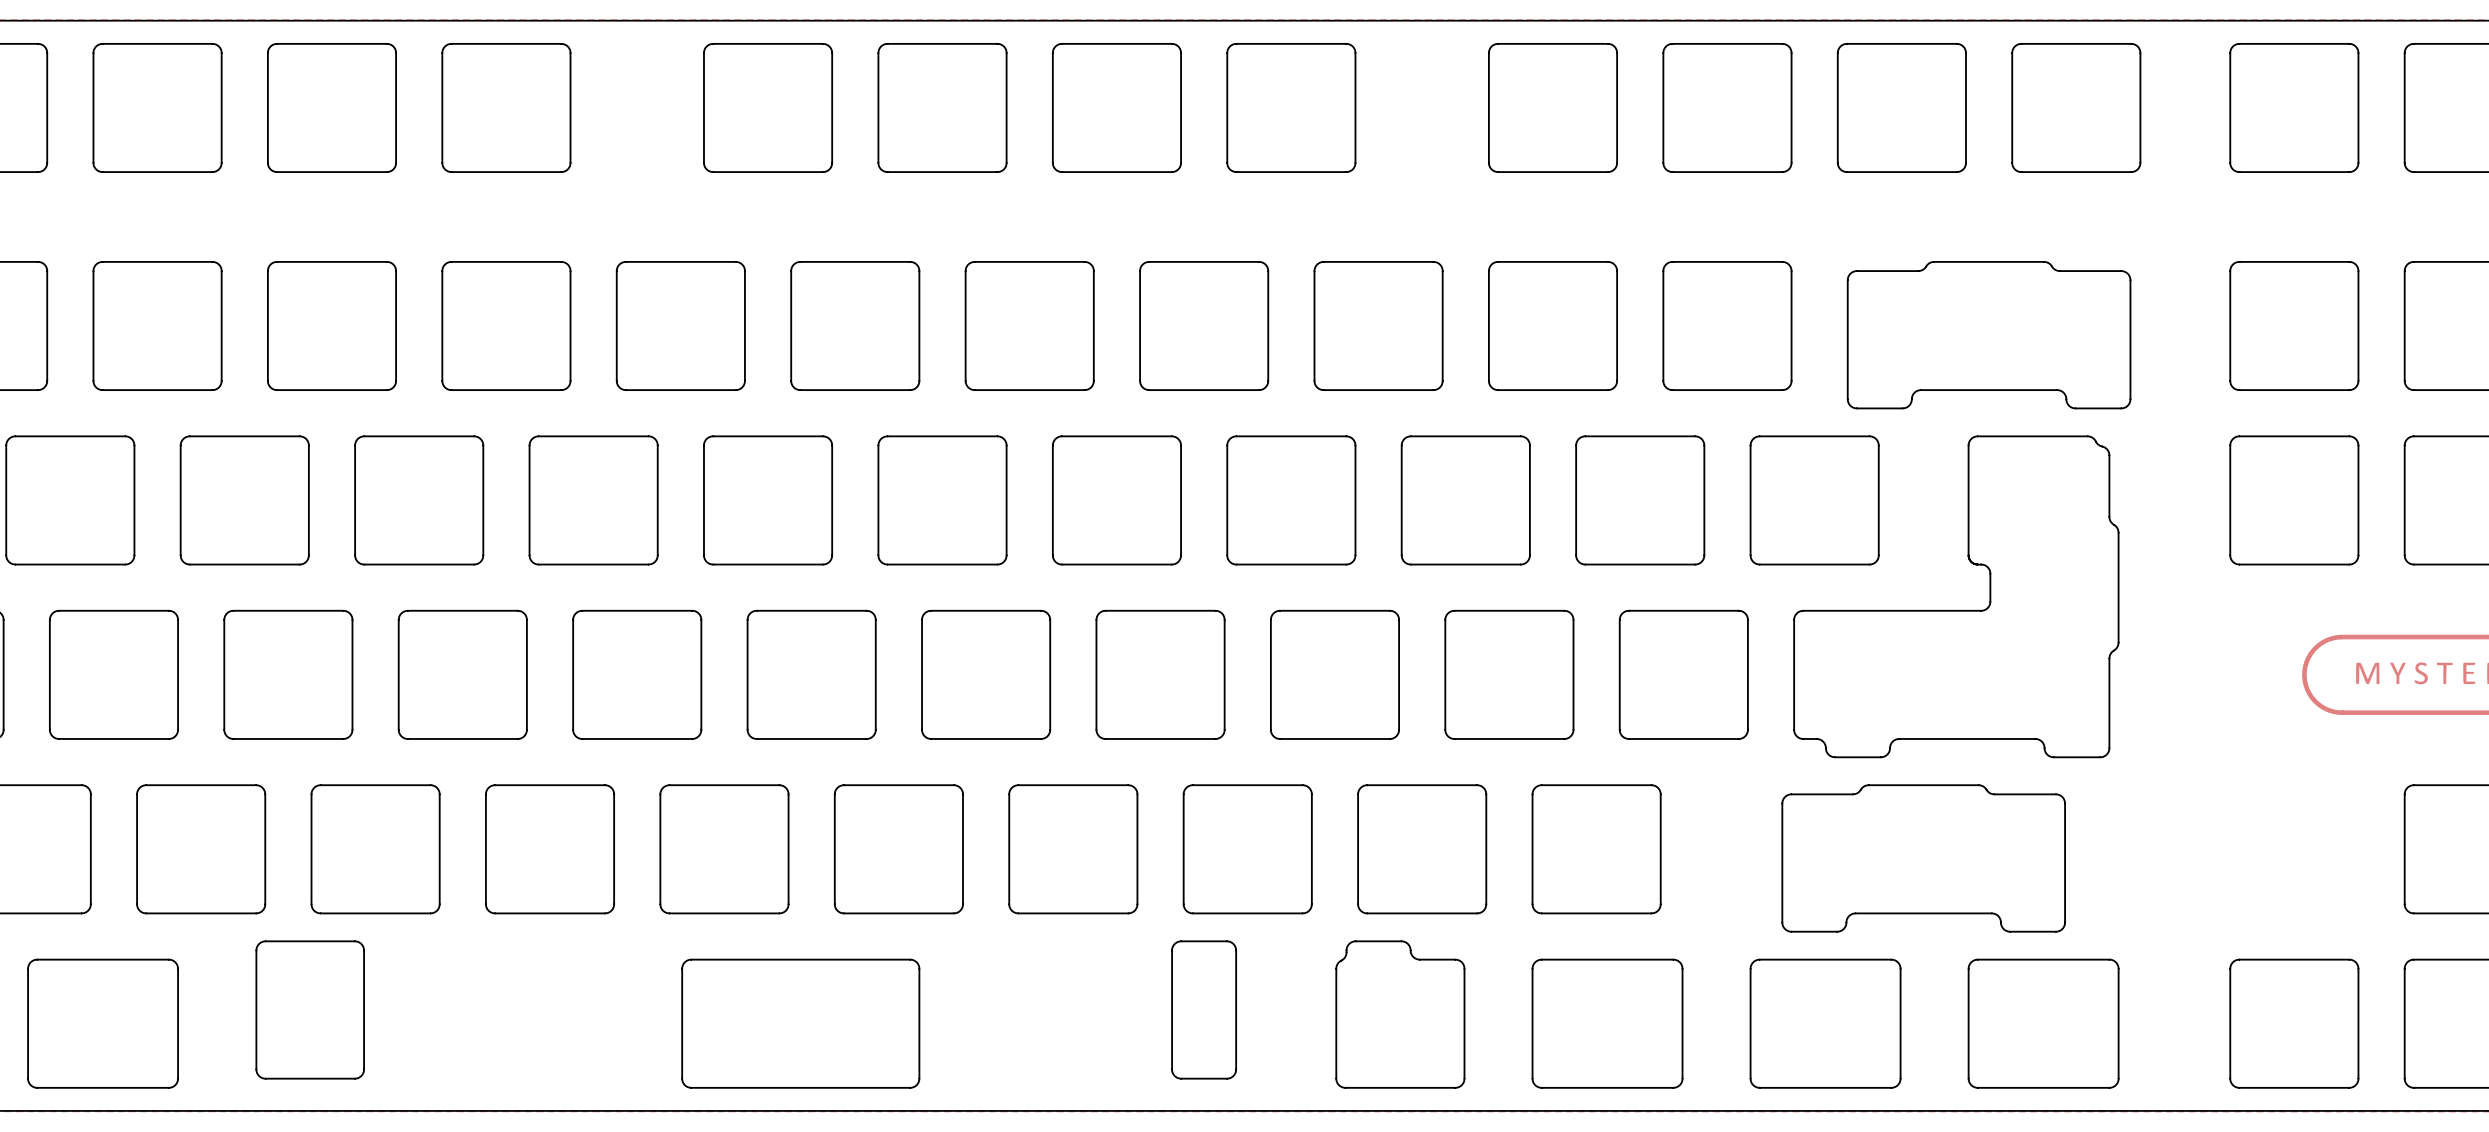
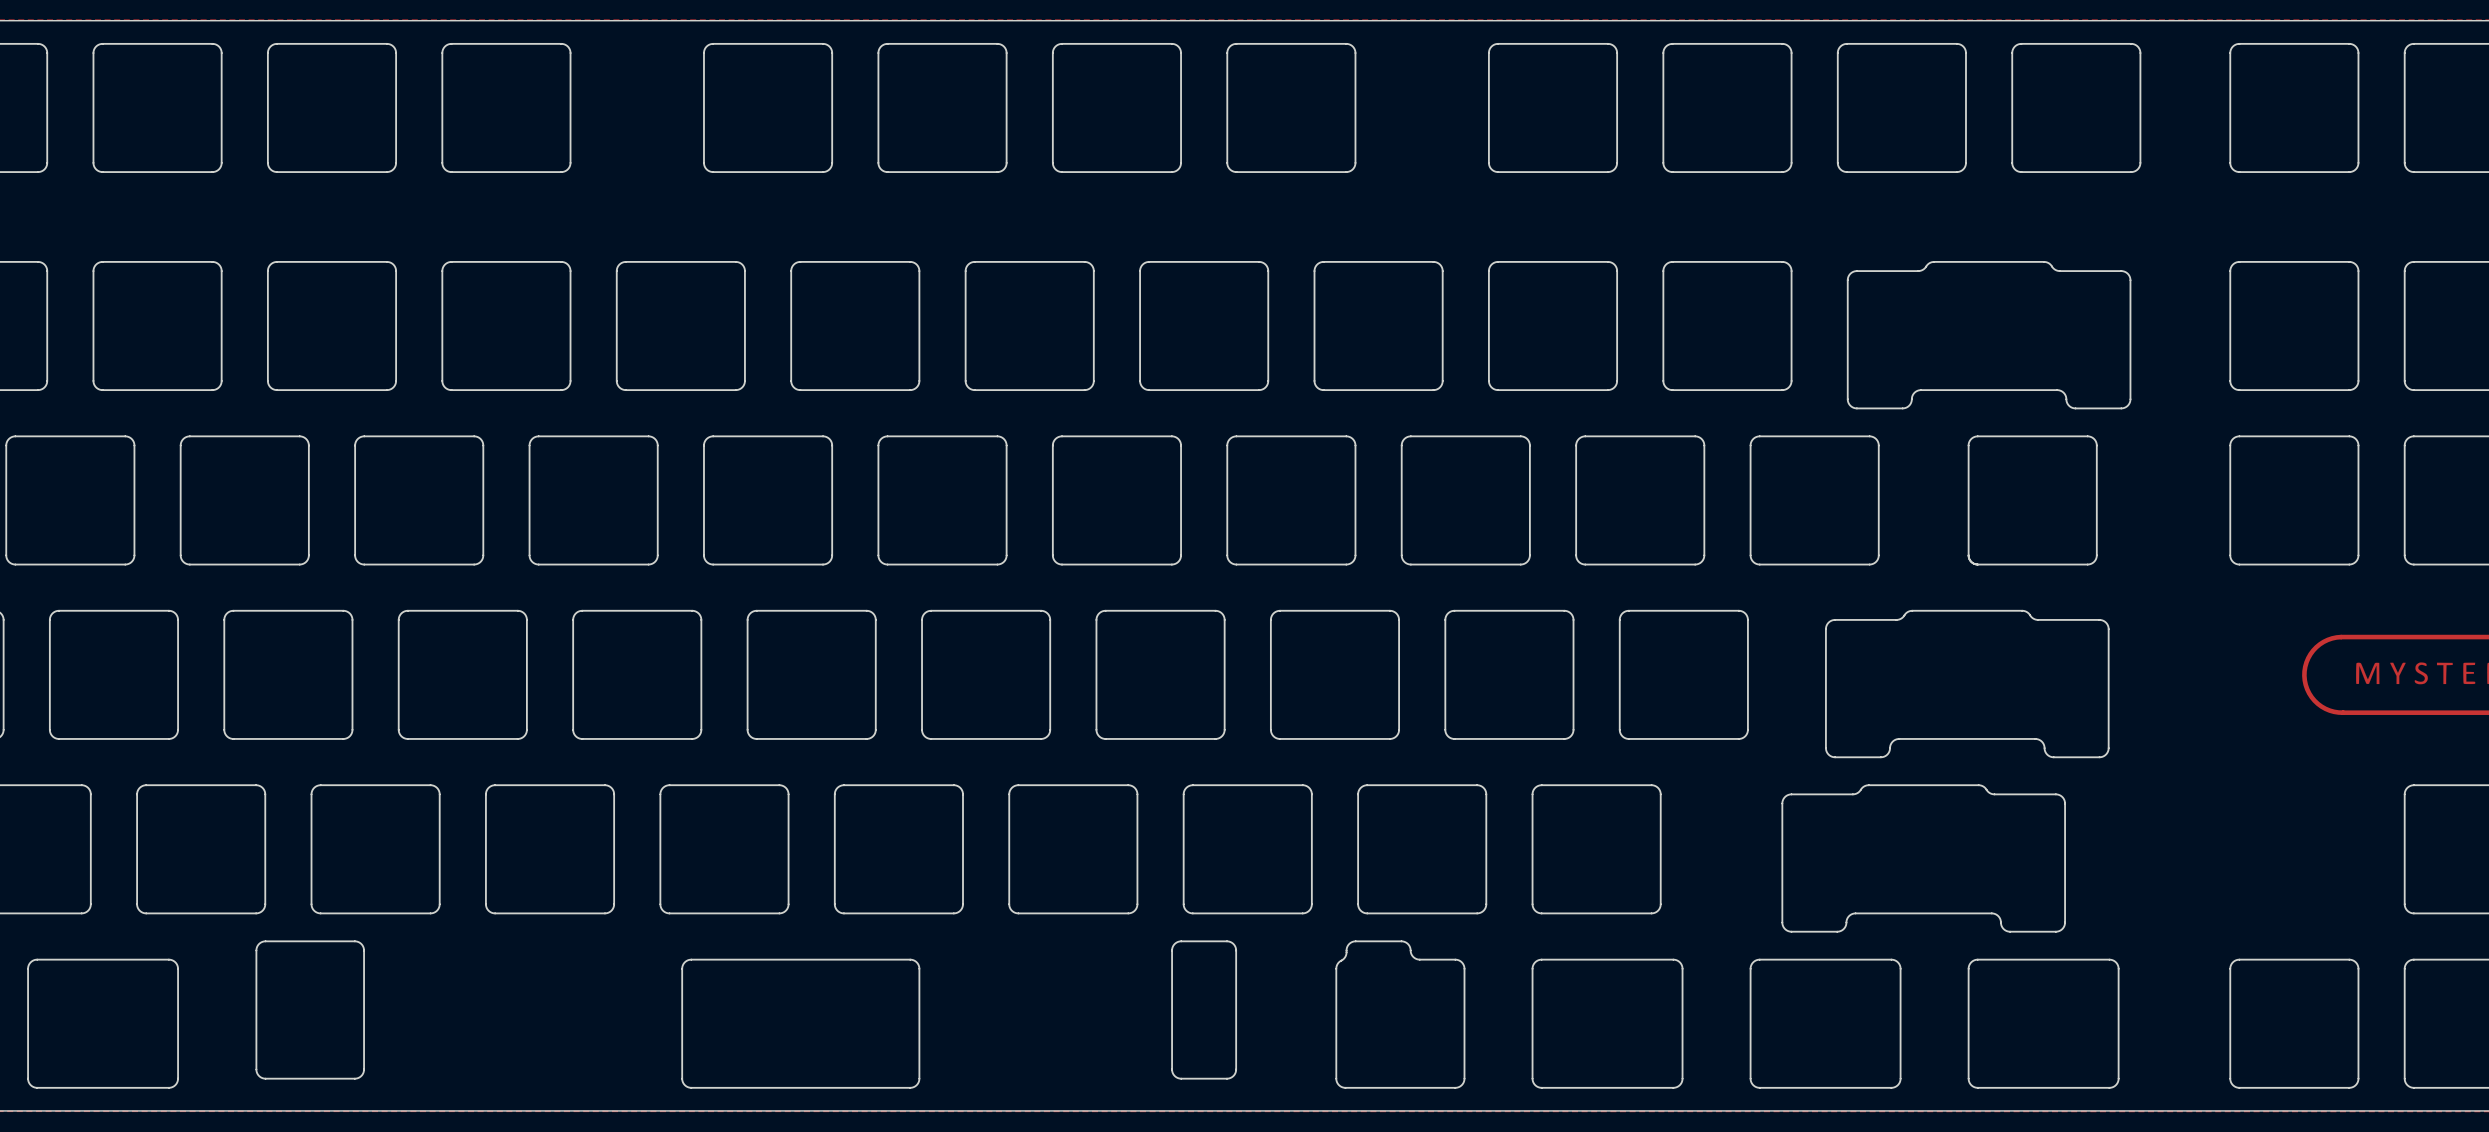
board edge: (2087, 436) (2093, 438) (2108, 452) (2109, 518) (2118, 532) (2118, 643) (2109, 657) (2109, 749) (2105, 755) (2099, 757) -> (1981, 610) (2023, 610) (2036, 619) (2099, 619) (2106, 623) (2108, 629) (2108, 748) (2105, 754) (2099, 757)
board edge: (1981, 564) (1987, 567) (1990, 573) (1990, 604) (1986, 608) (1981, 610) -> (1981, 564) (2087, 564) (2094, 560) (2096, 555) (2096, 445) (2094, 439) (2087, 436)
board edge: (1912, 610) (1803, 610) (1795, 615) (1794, 732) (1800, 738) (1821, 740) (1825, 744) (1827, 753) (1835, 757) -> (1912, 610) (1897, 619) (1833, 620) (1827, 624) (1825, 748) (1828, 754) (1835, 757)

